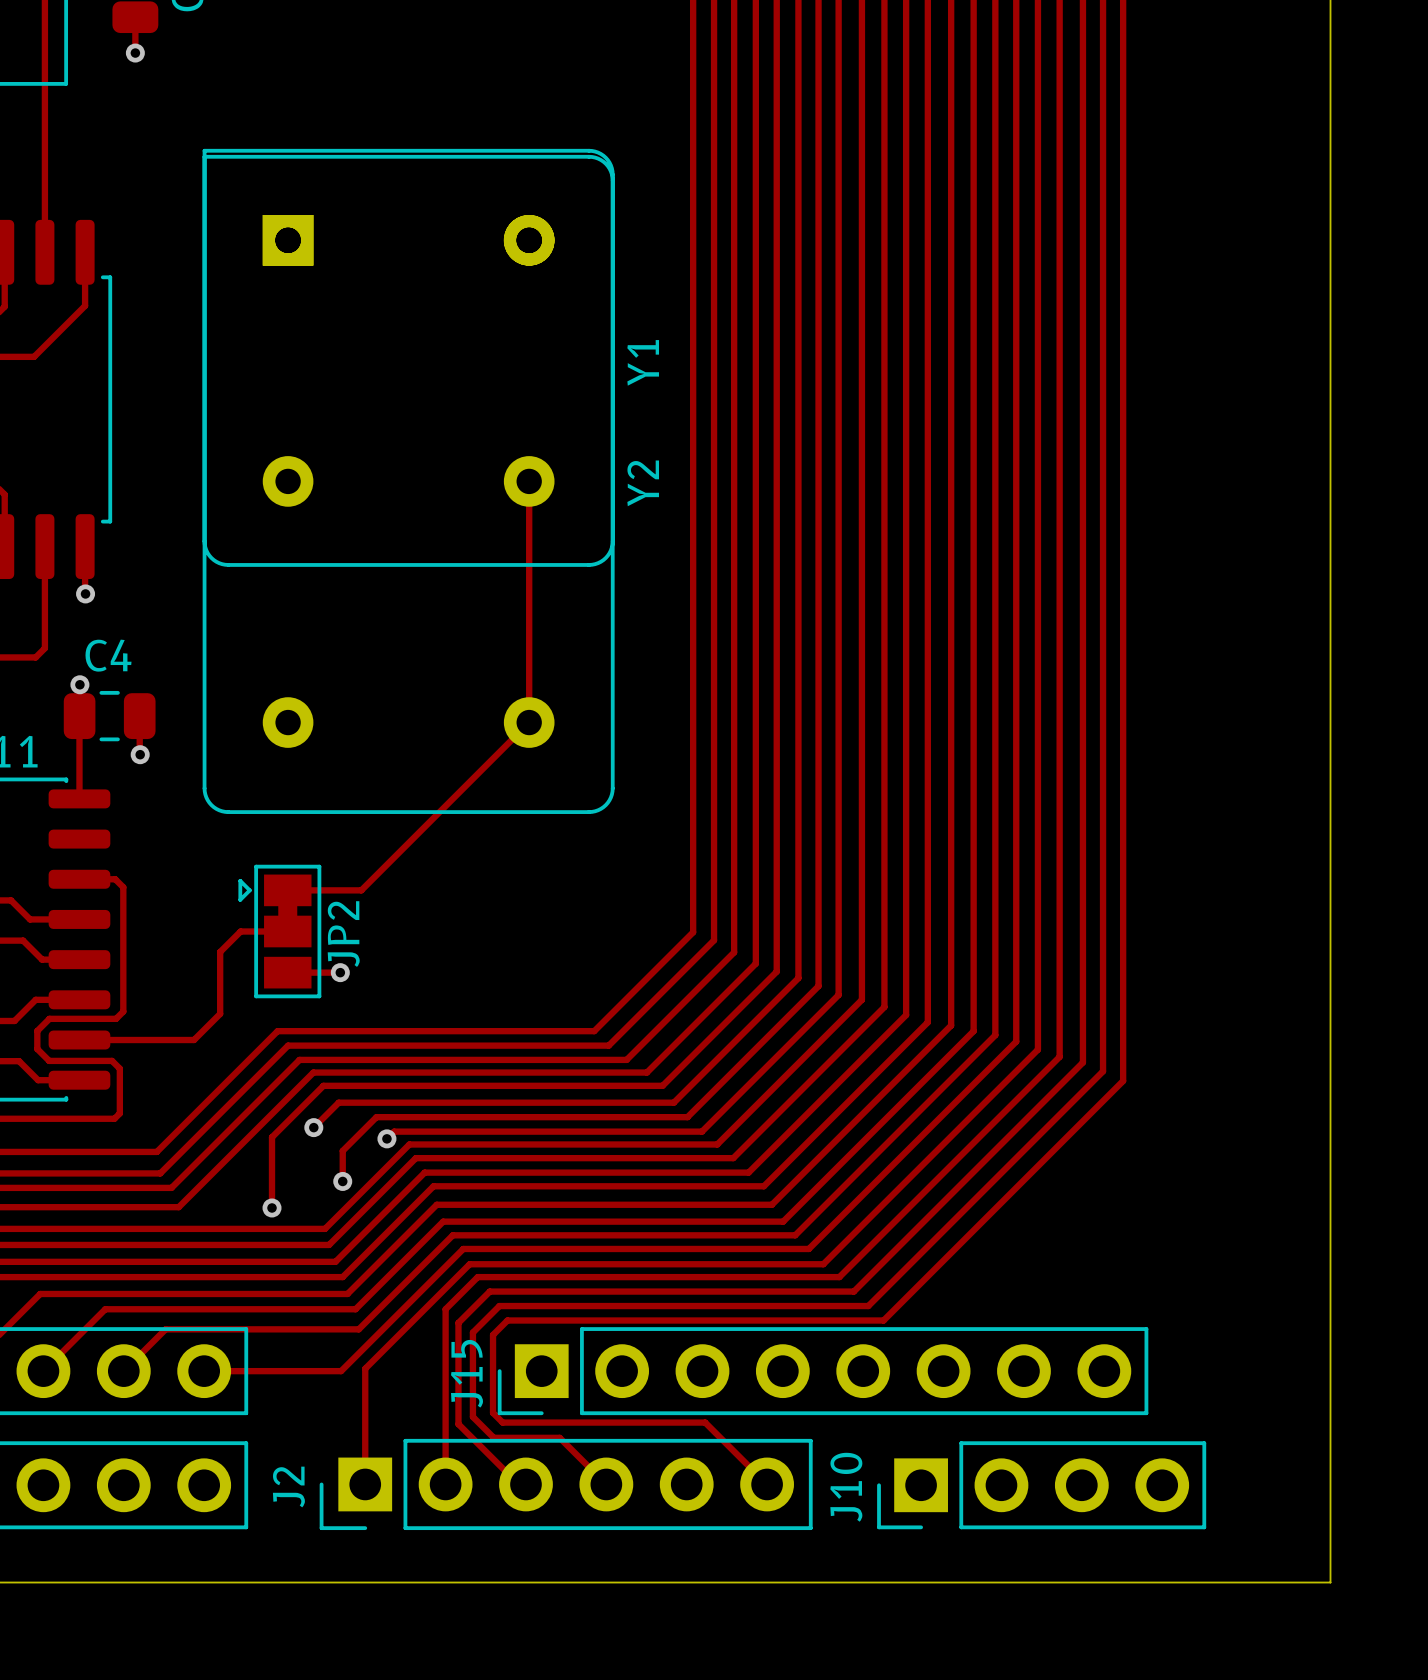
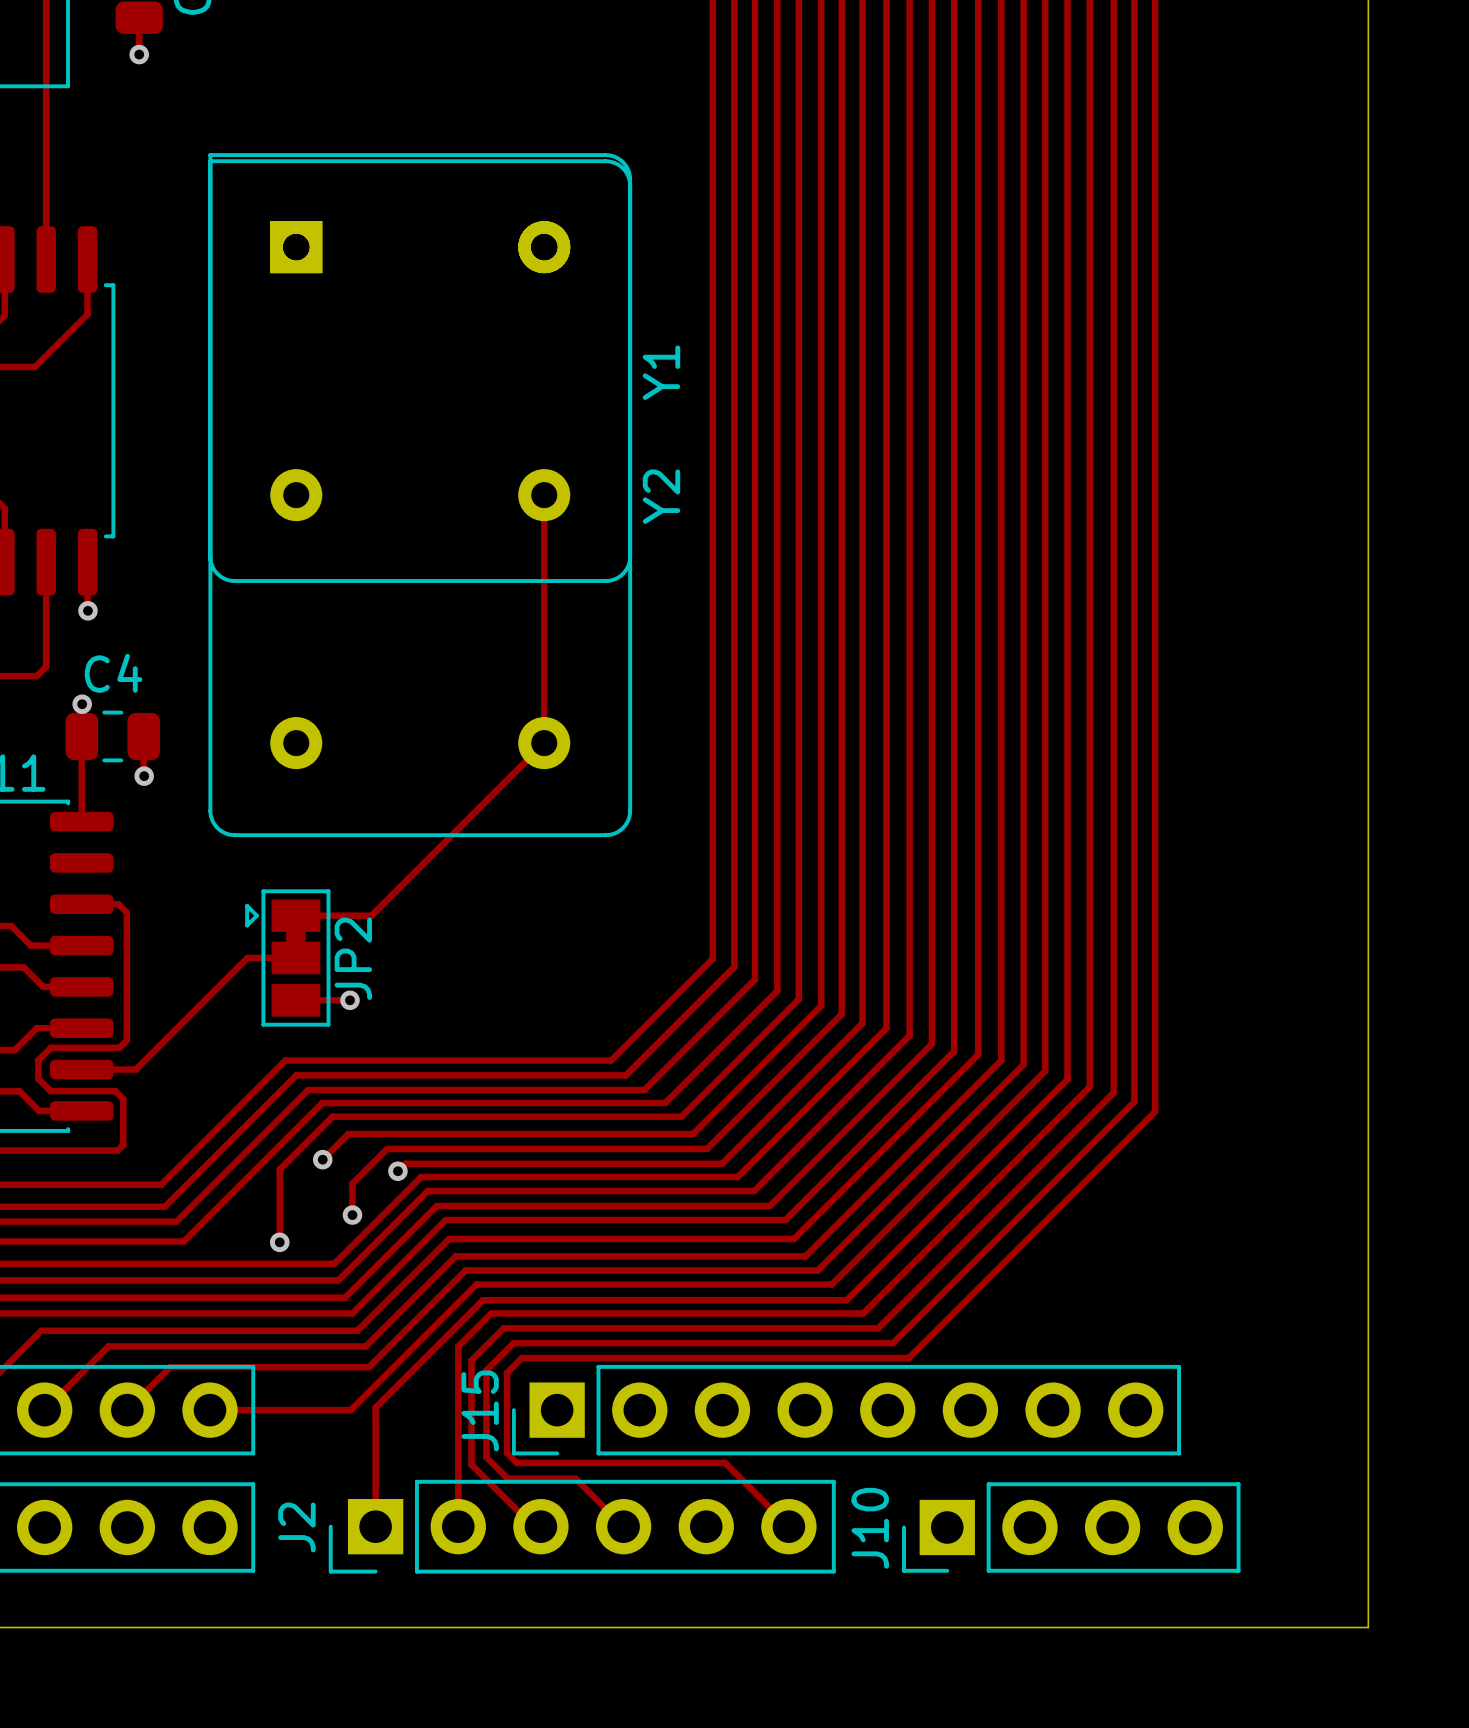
track: (220, 952) (220, 1013) (194, 1040) (132, 1040) -> (226, 979) (135, 1069)

